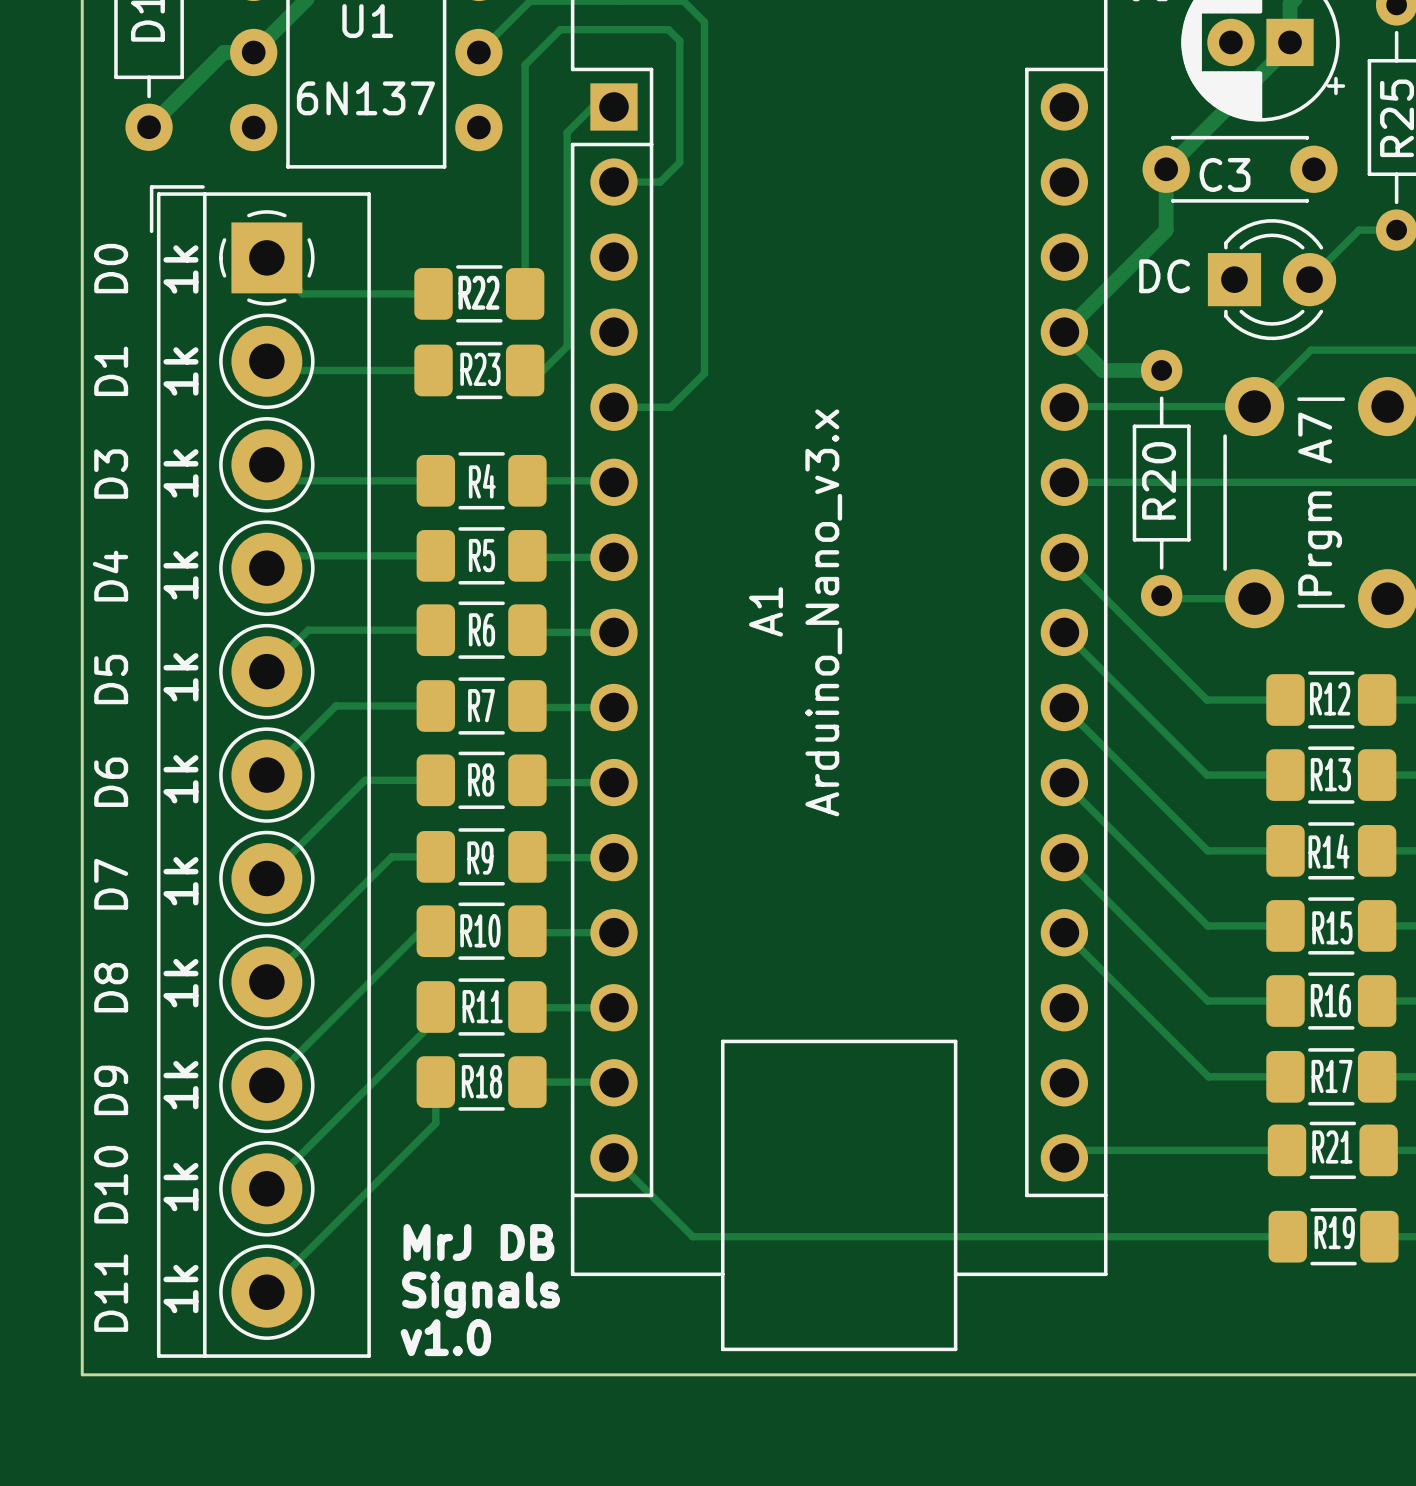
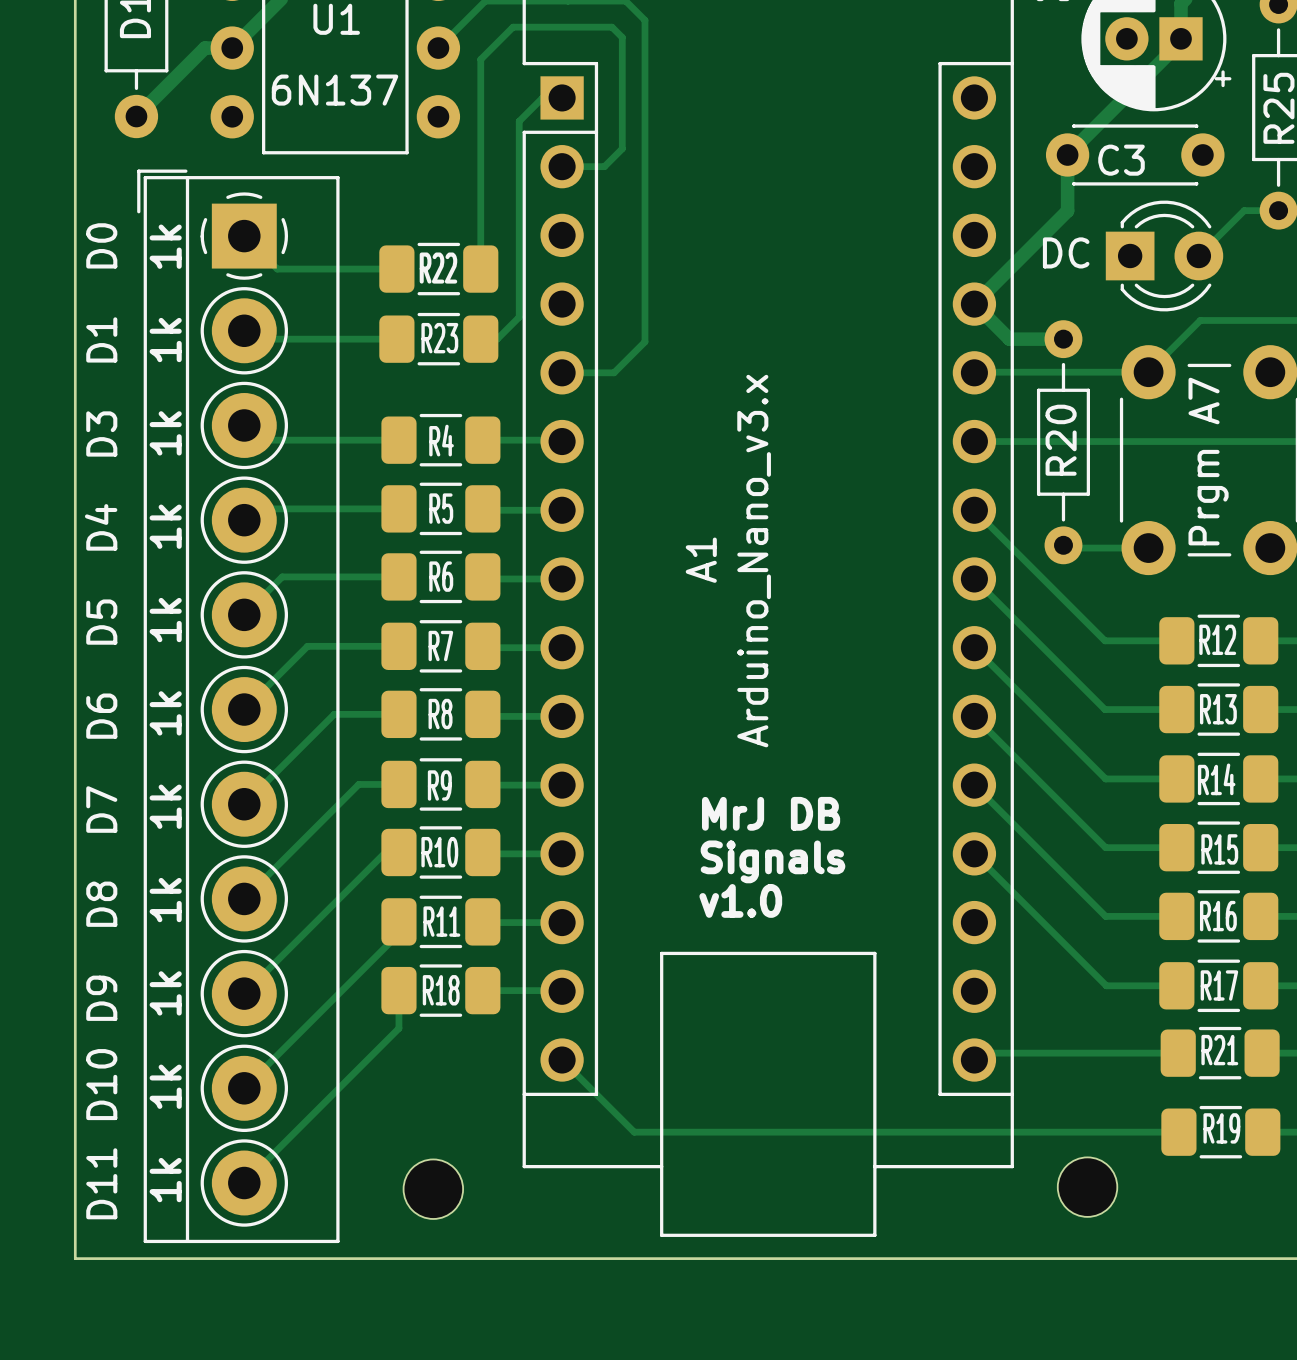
text position: MrJ DB (478, 1242) -> MrJ DB (771, 813)
text position: Signals (481, 1295) -> Signals (772, 861)
part: none -> (1087, 1187)
part: none -> (433, 1189)
text position: v1.0 (445, 1337) -> v1.0 (740, 900)

